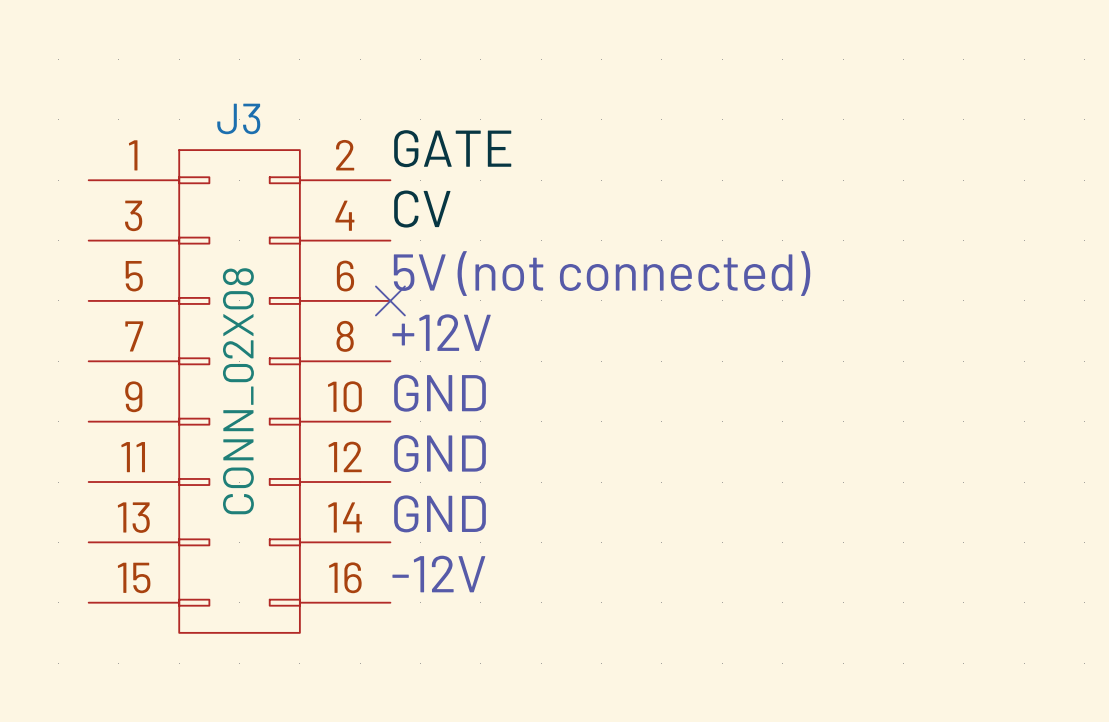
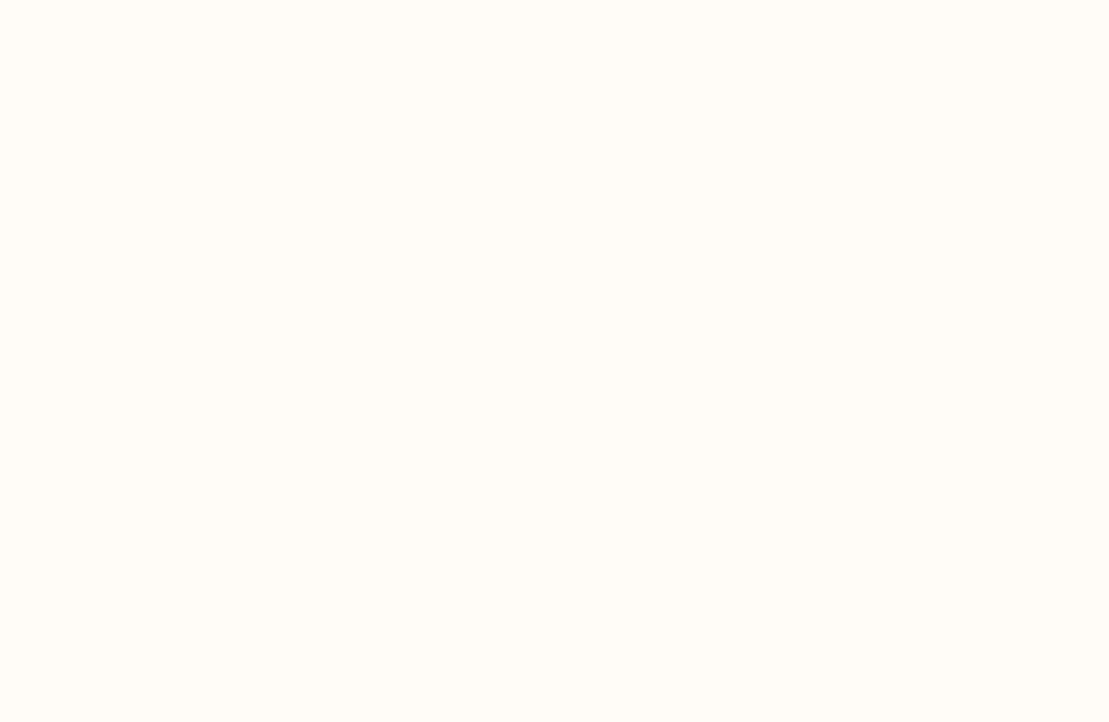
label: GATE (452, 148) -> none
label: CV (422, 209) -> none
text: 5V (not connected) (602, 273) -> none
no-connect mark: (390, 300) -> none
text: +12V (441, 332) -> none
J3: CONN_02X08 (239, 391) -> none
text: GND (440, 393) -> none
text: GND (440, 453) -> none
text: GND (440, 513) -> none
text: -12V (438, 574) -> none

